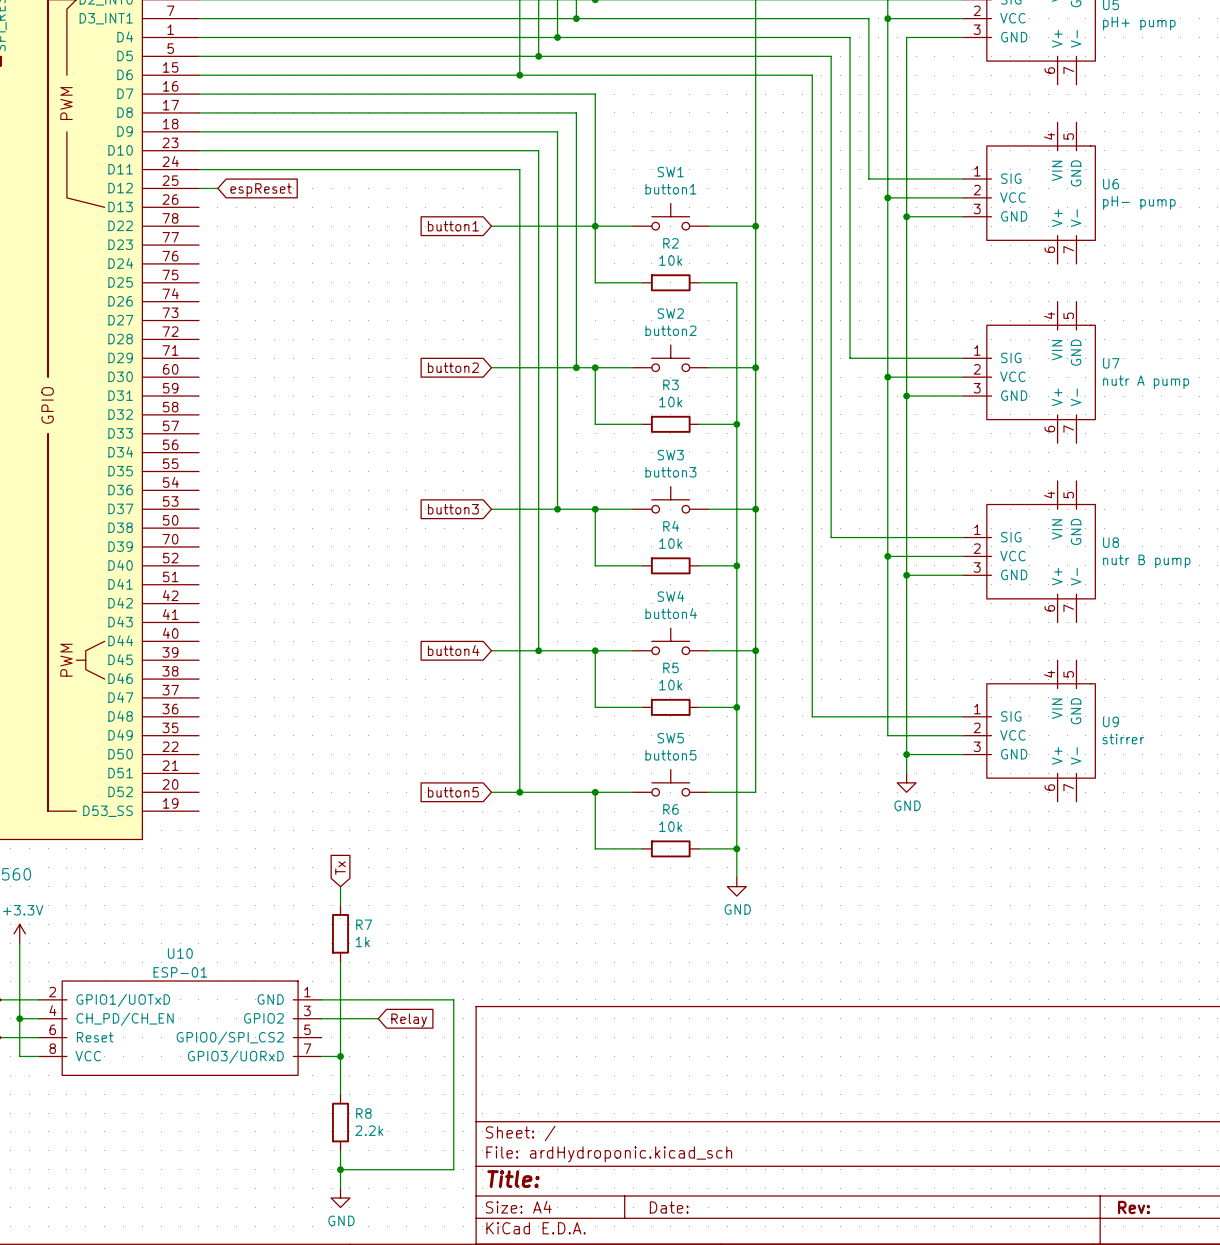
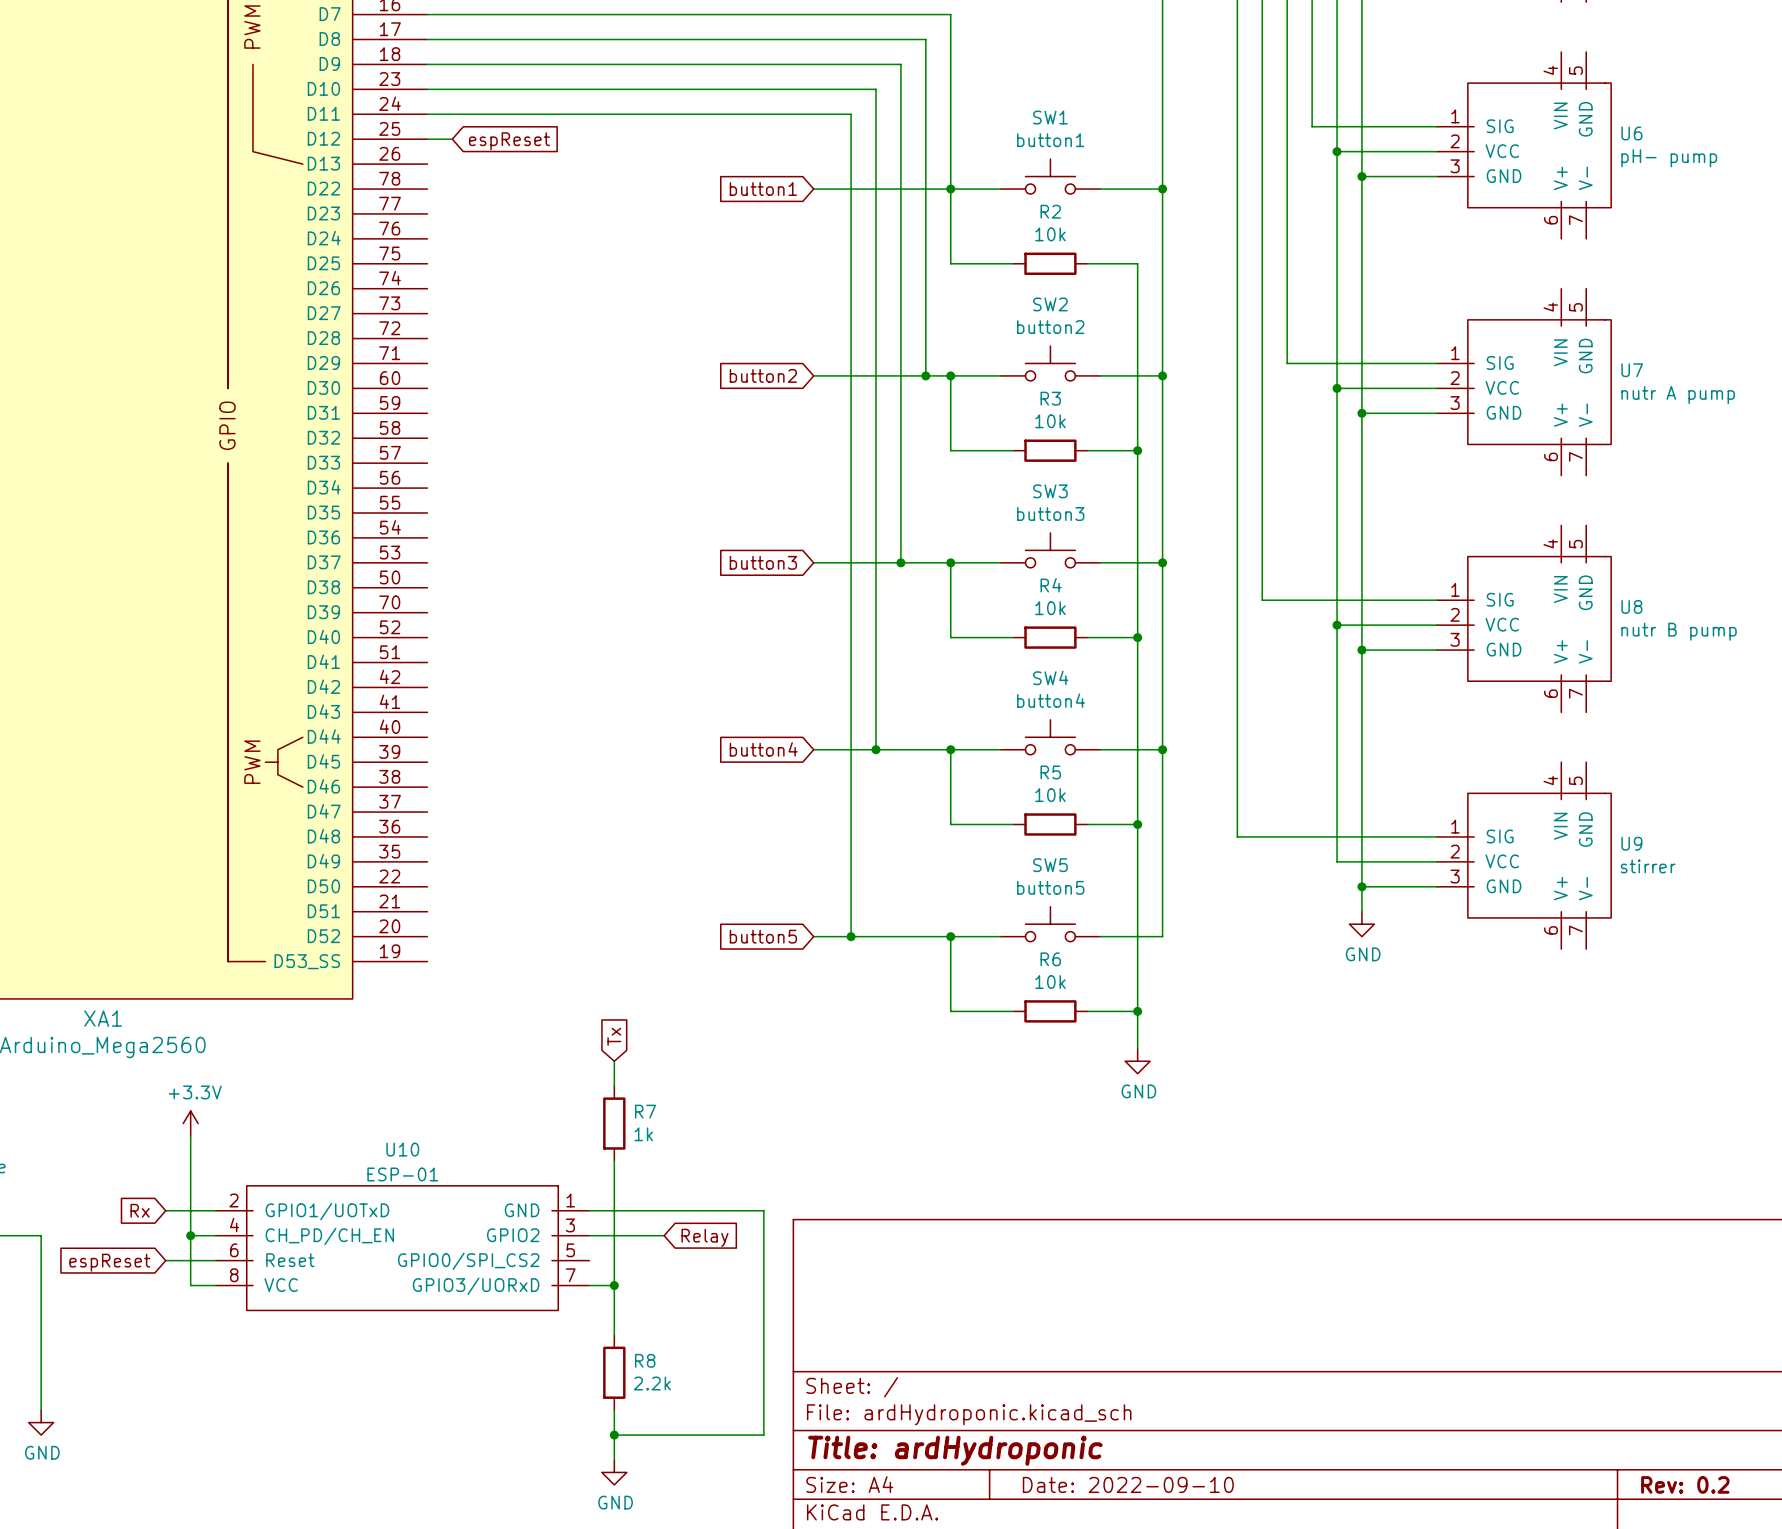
title block: Title: (513, 1179) -> Title: ardHydroponic (955, 1450)
title block: Date: (669, 1207) -> Date: 2022-09-10 (1128, 1484)
title block: Rev: (1133, 1207) -> Rev: 0.2 (1685, 1484)

